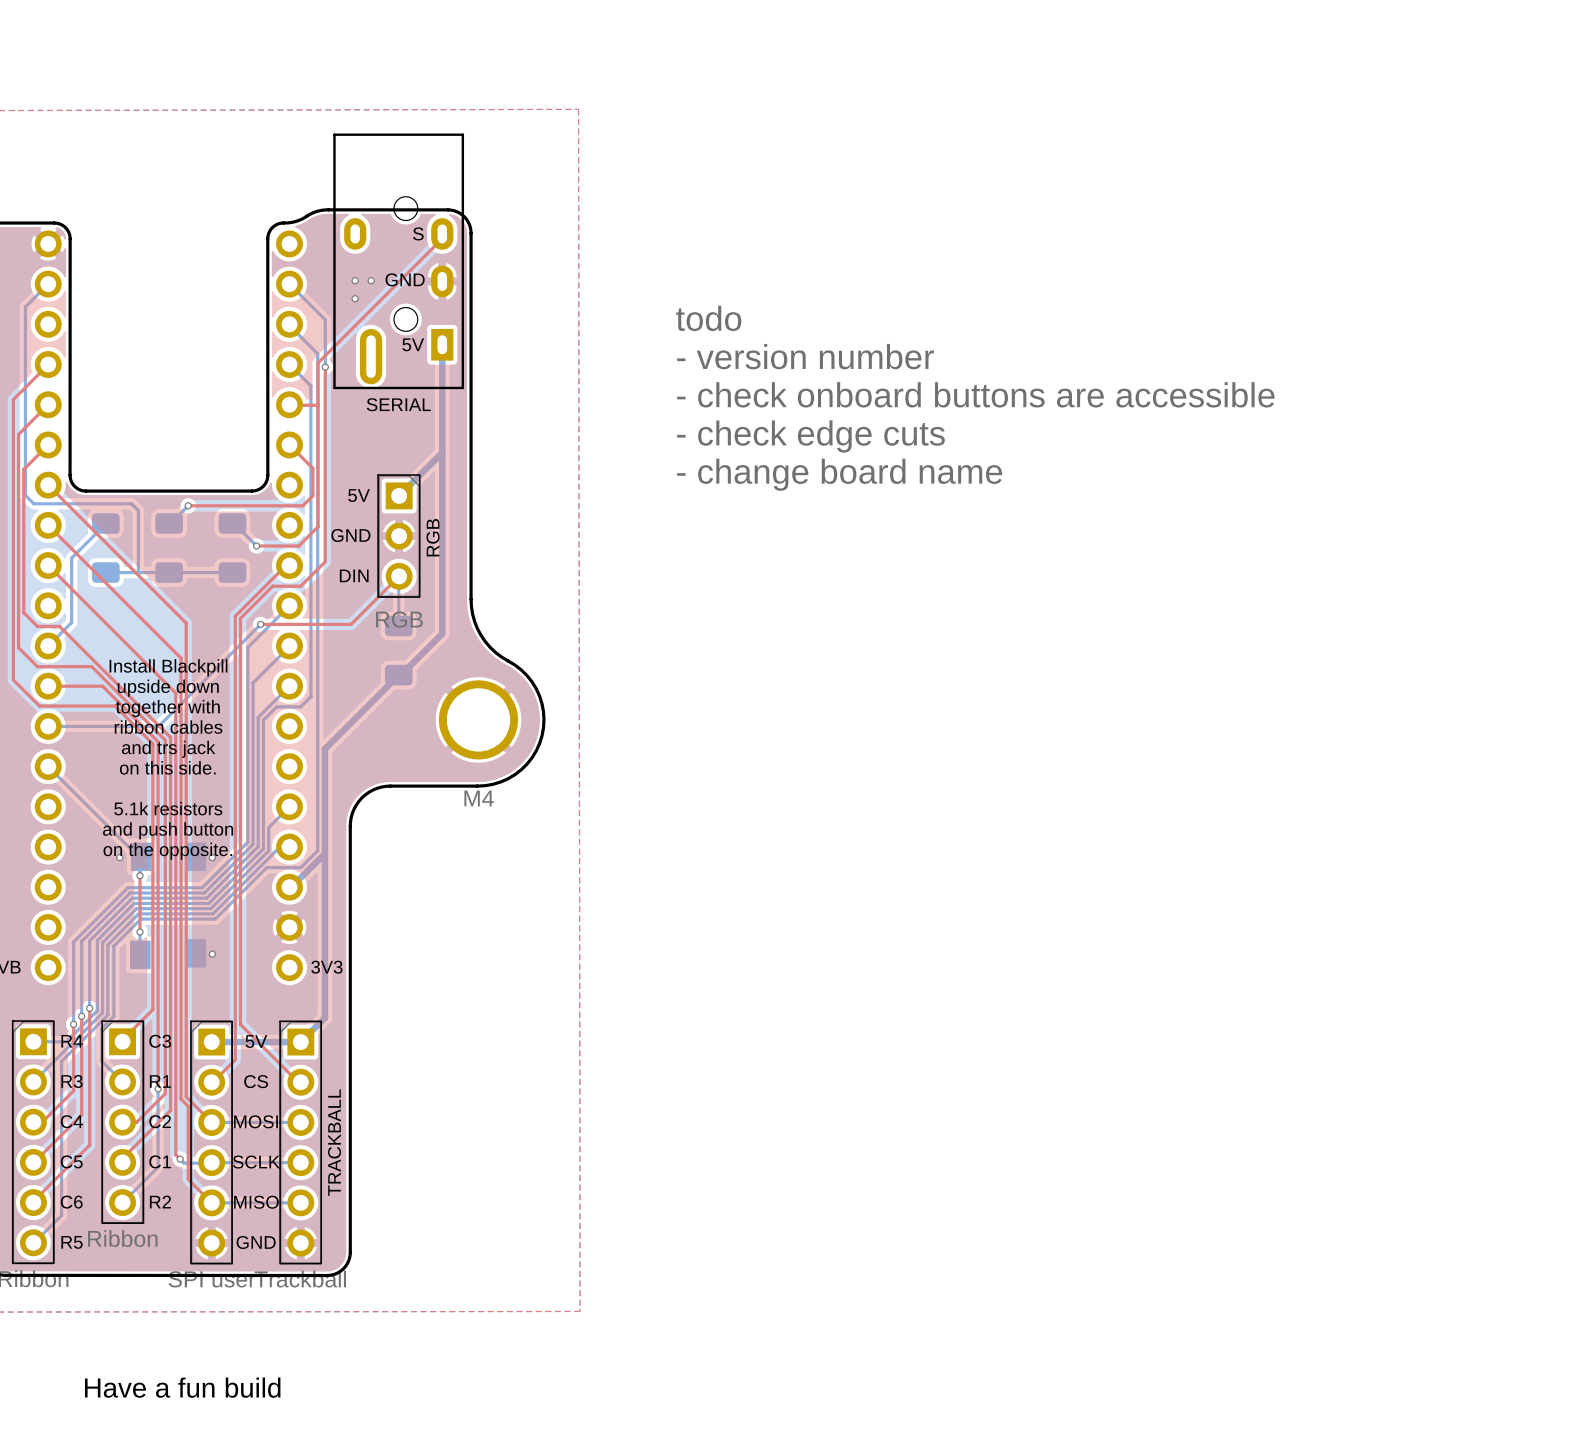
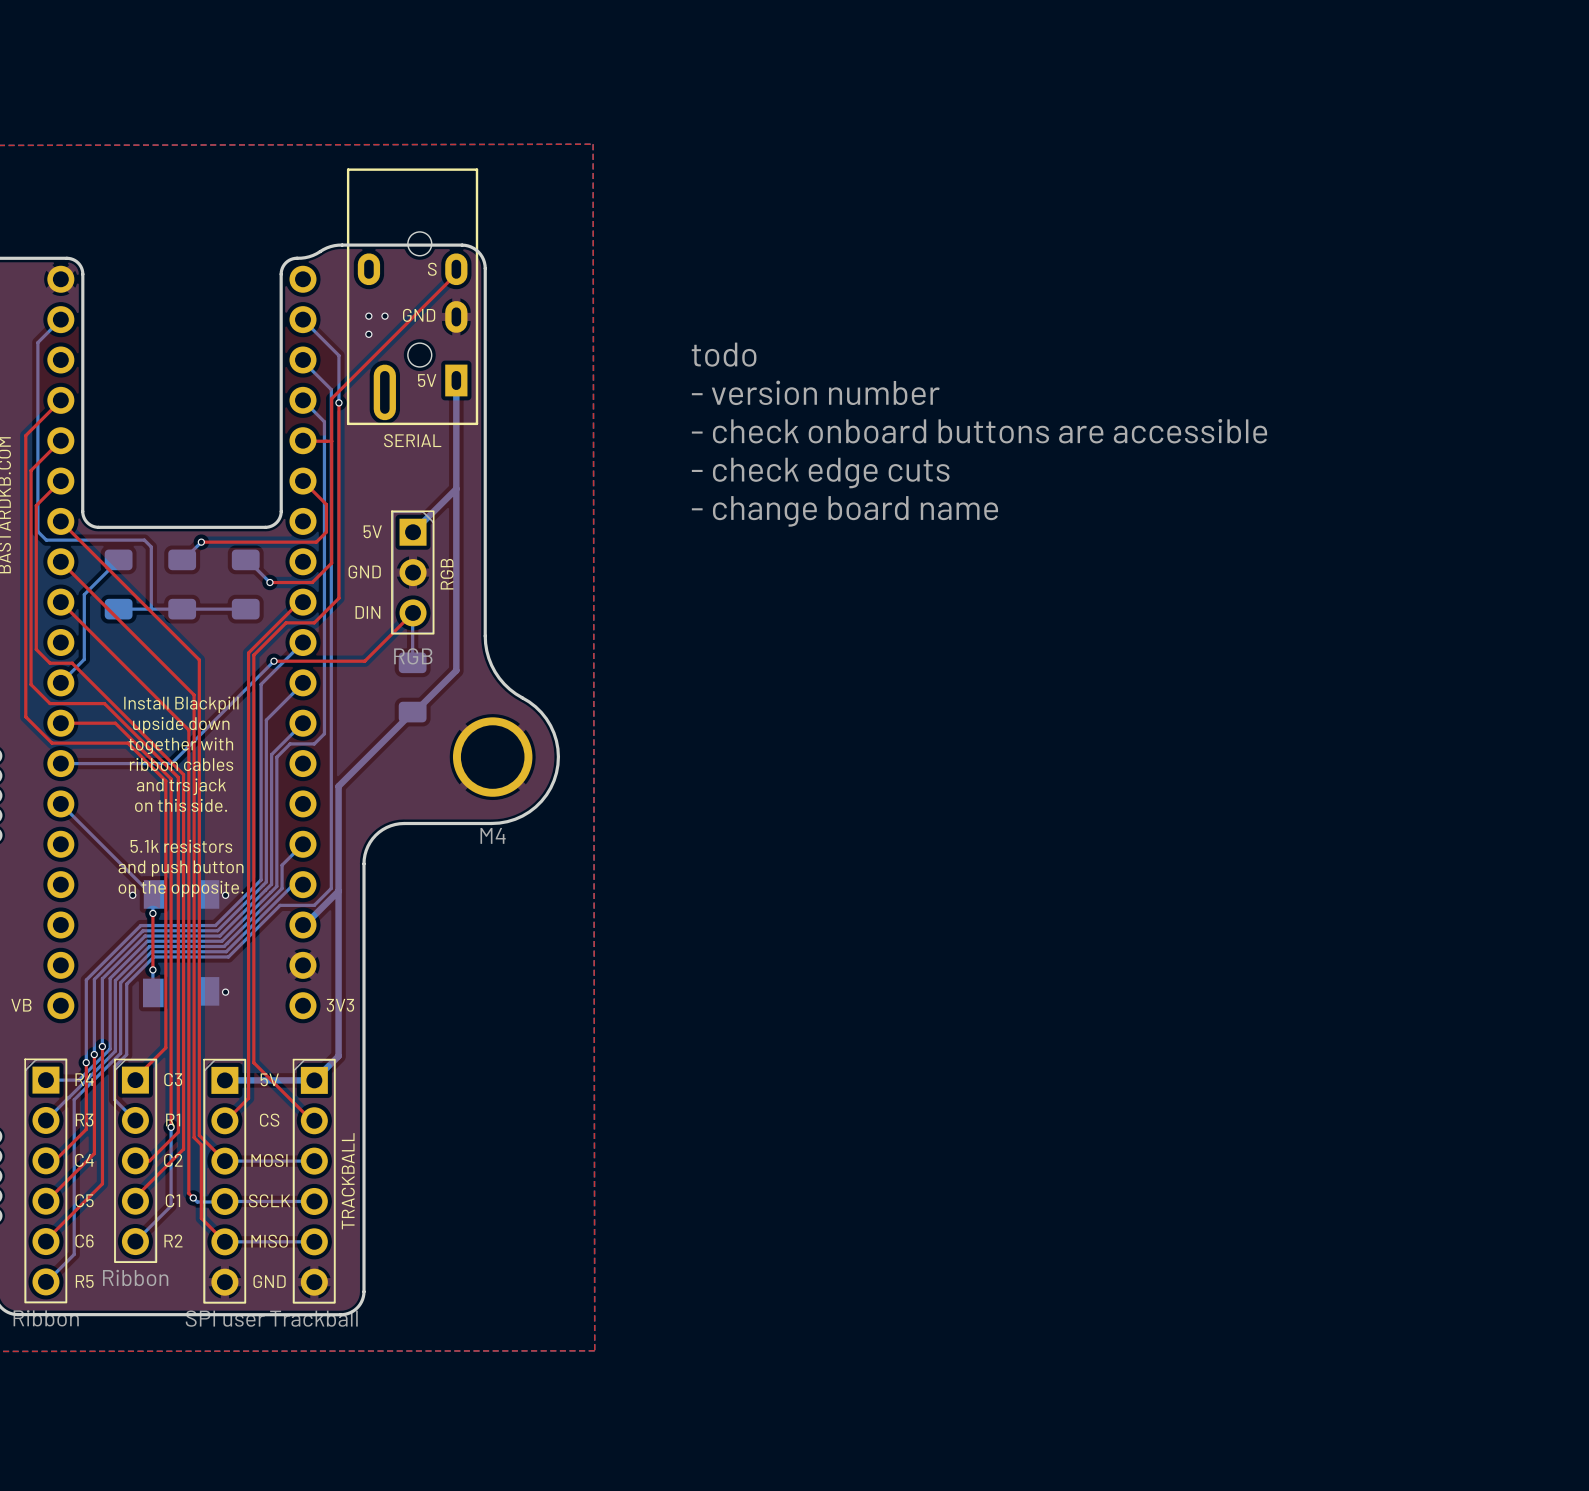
text: Have a fun build (182, 1387) -> none

